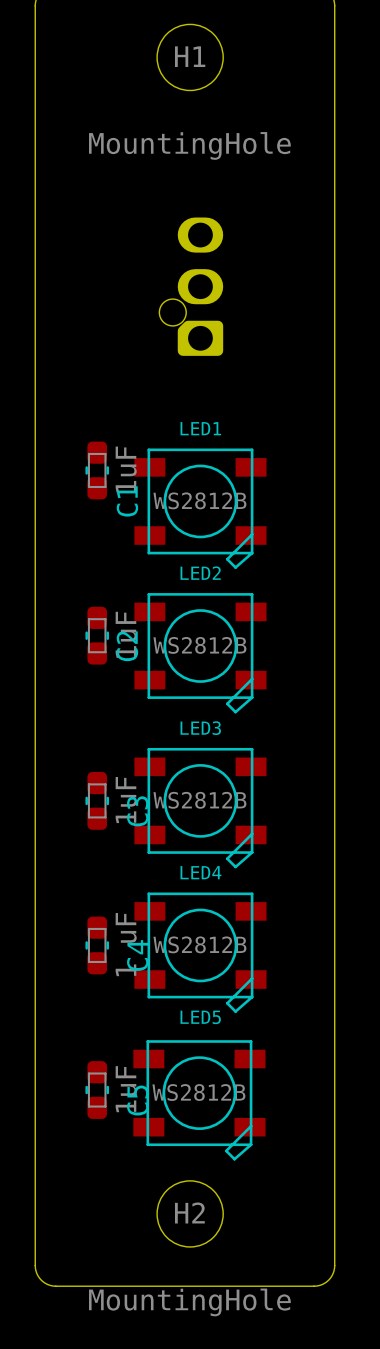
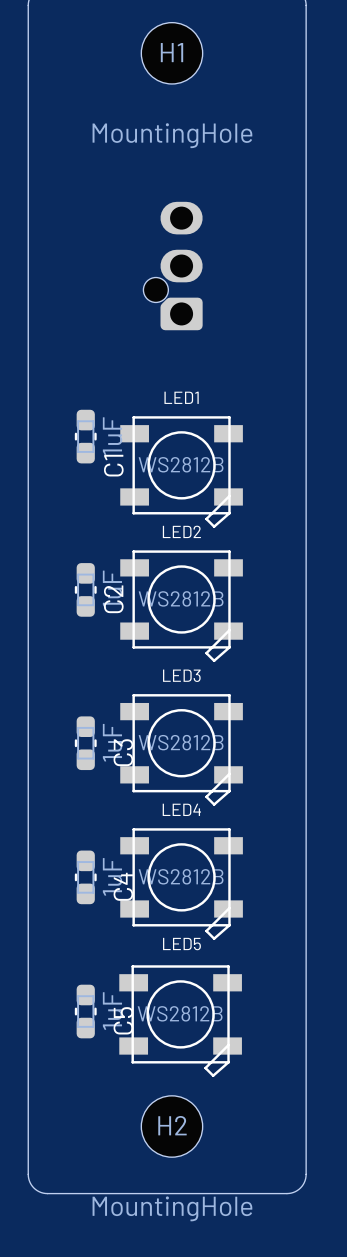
C4 value: 1 uF (126, 944) -> 1uF (112, 876)

